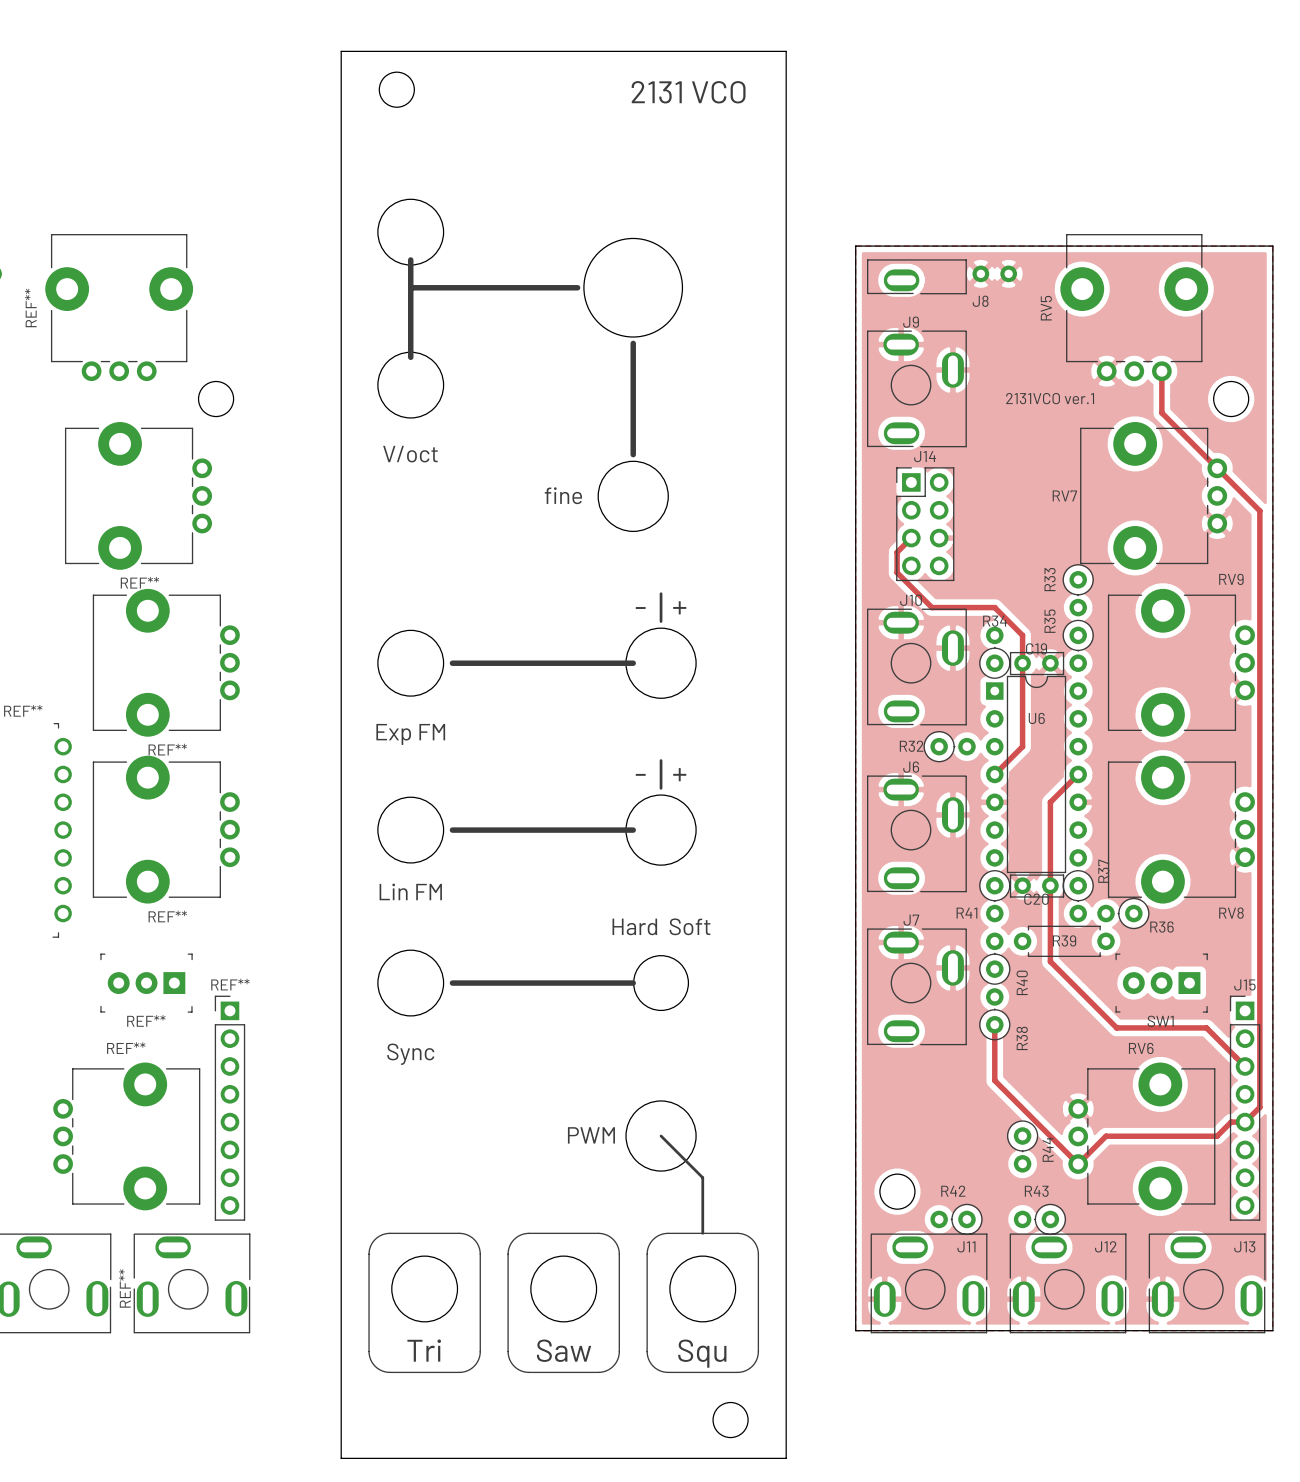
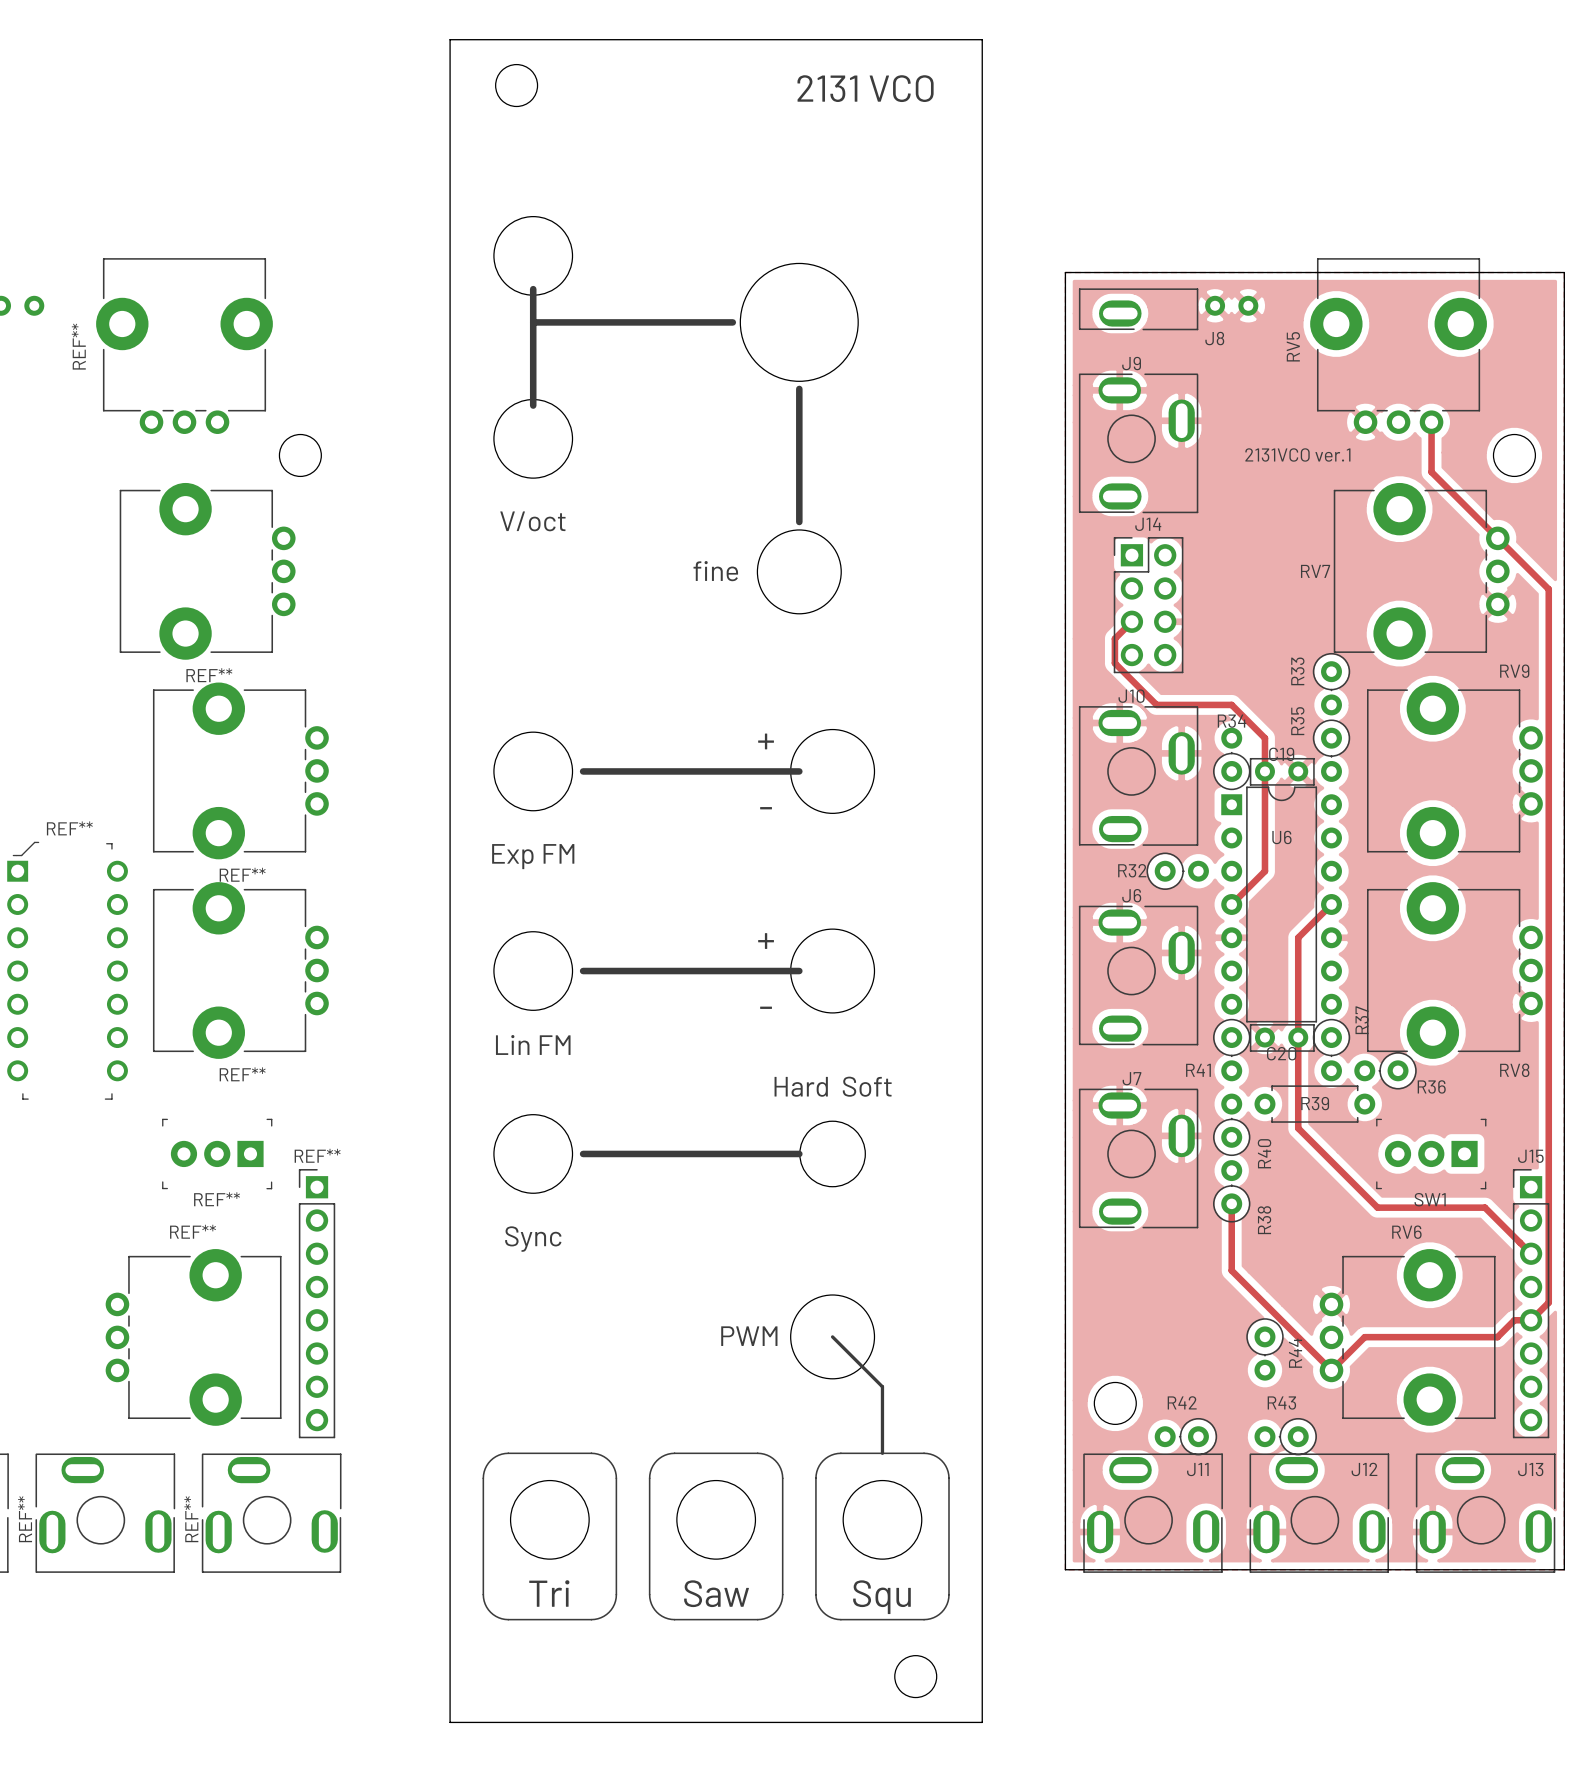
line: (661, 593) (661, 621) -> none
part name: - + (661, 607) -> + (766, 741)
text: none -> - (766, 808)
line: (661, 760) (661, 788) -> none
part name: - + (661, 774) -> + (766, 941)
text: none -> - (766, 1007)

